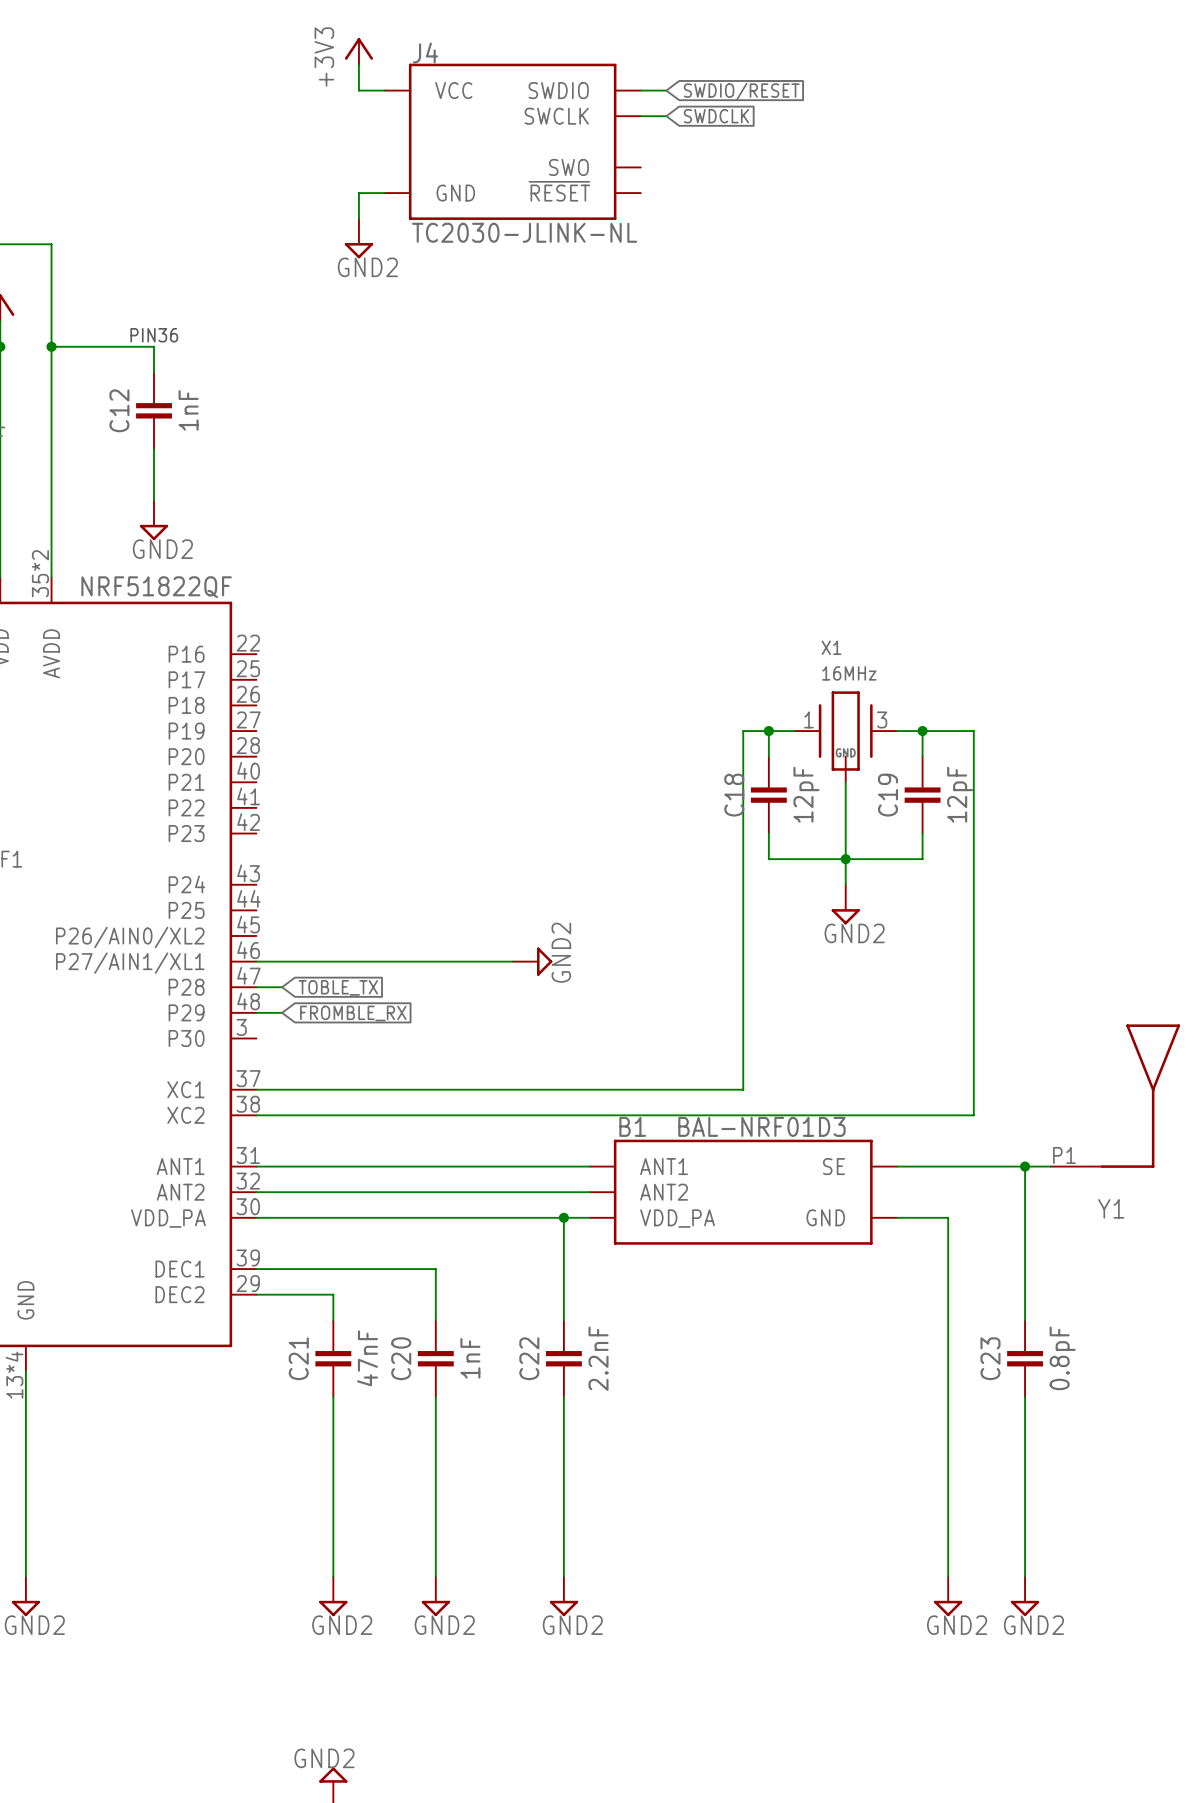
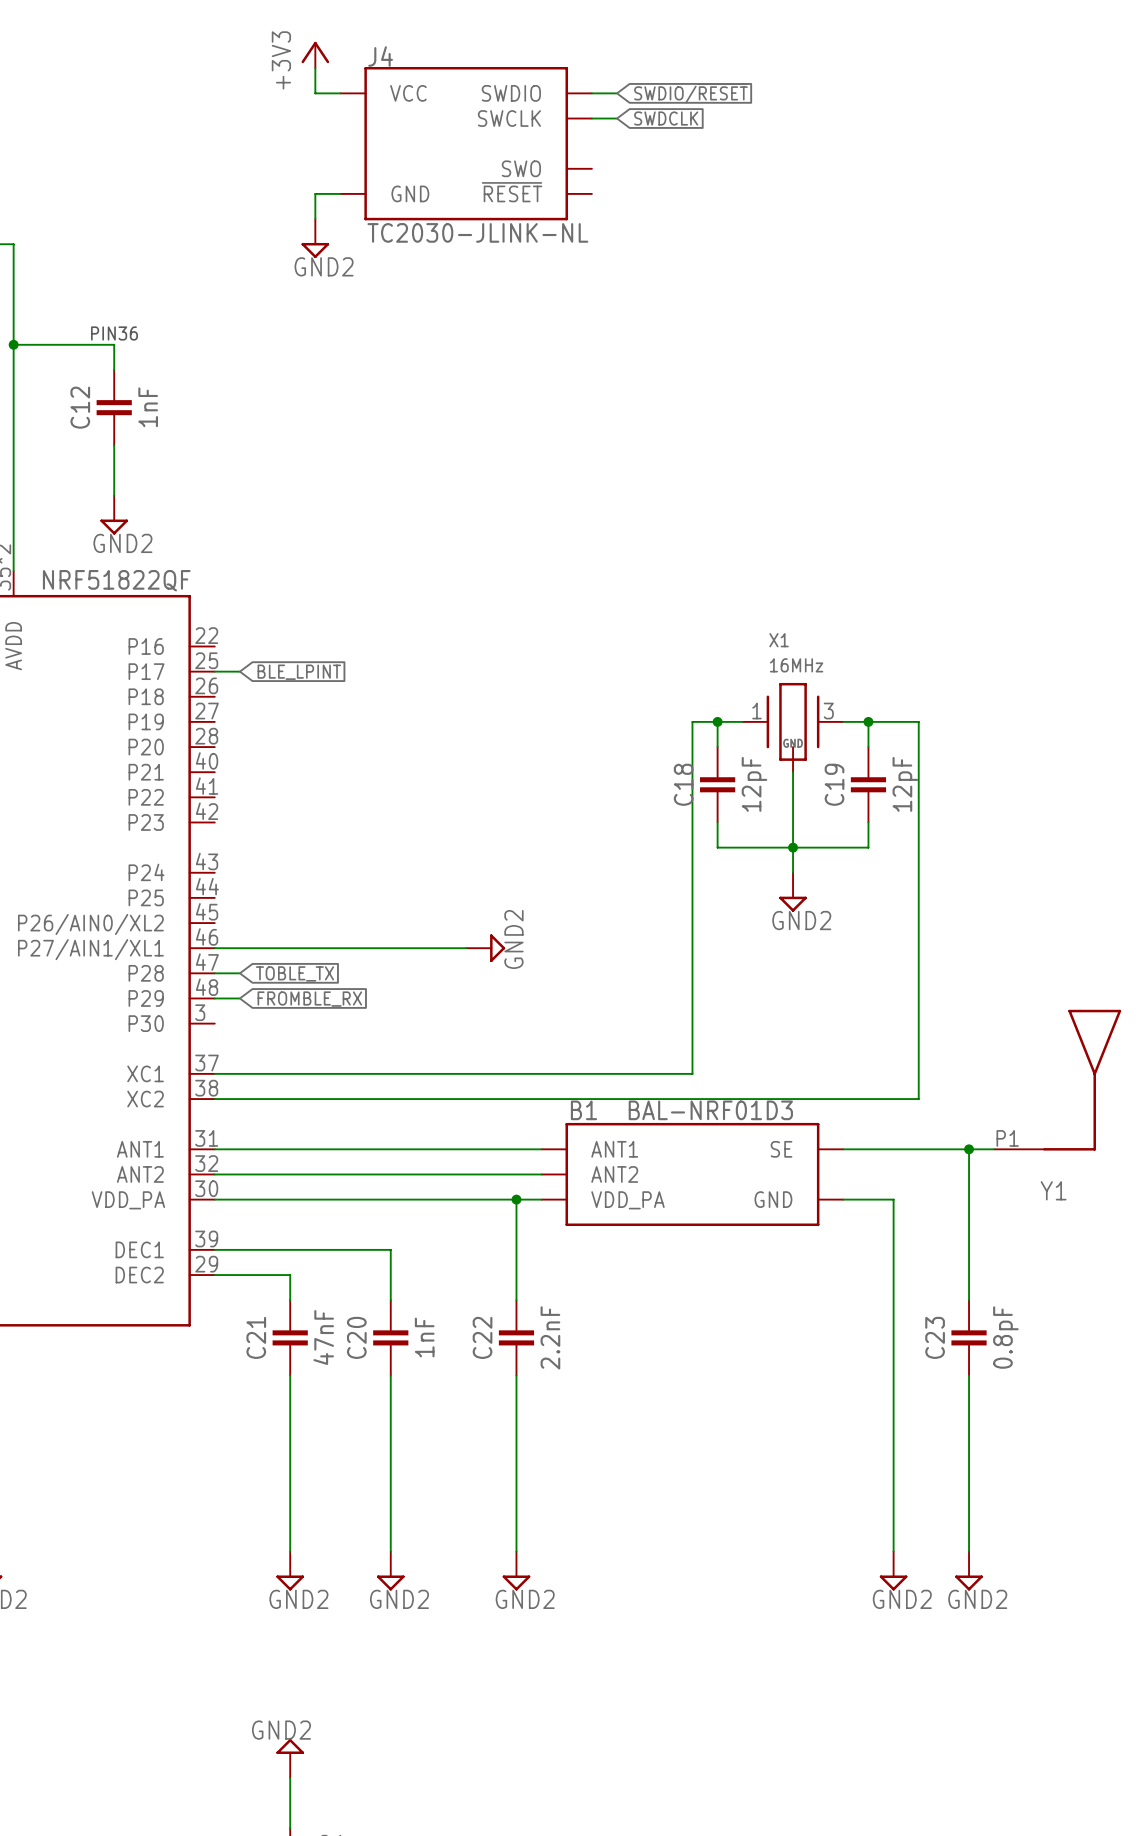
wire: none -> (214, 671) (239, 671)
global label: none -> BLE_LPINT (299, 672)

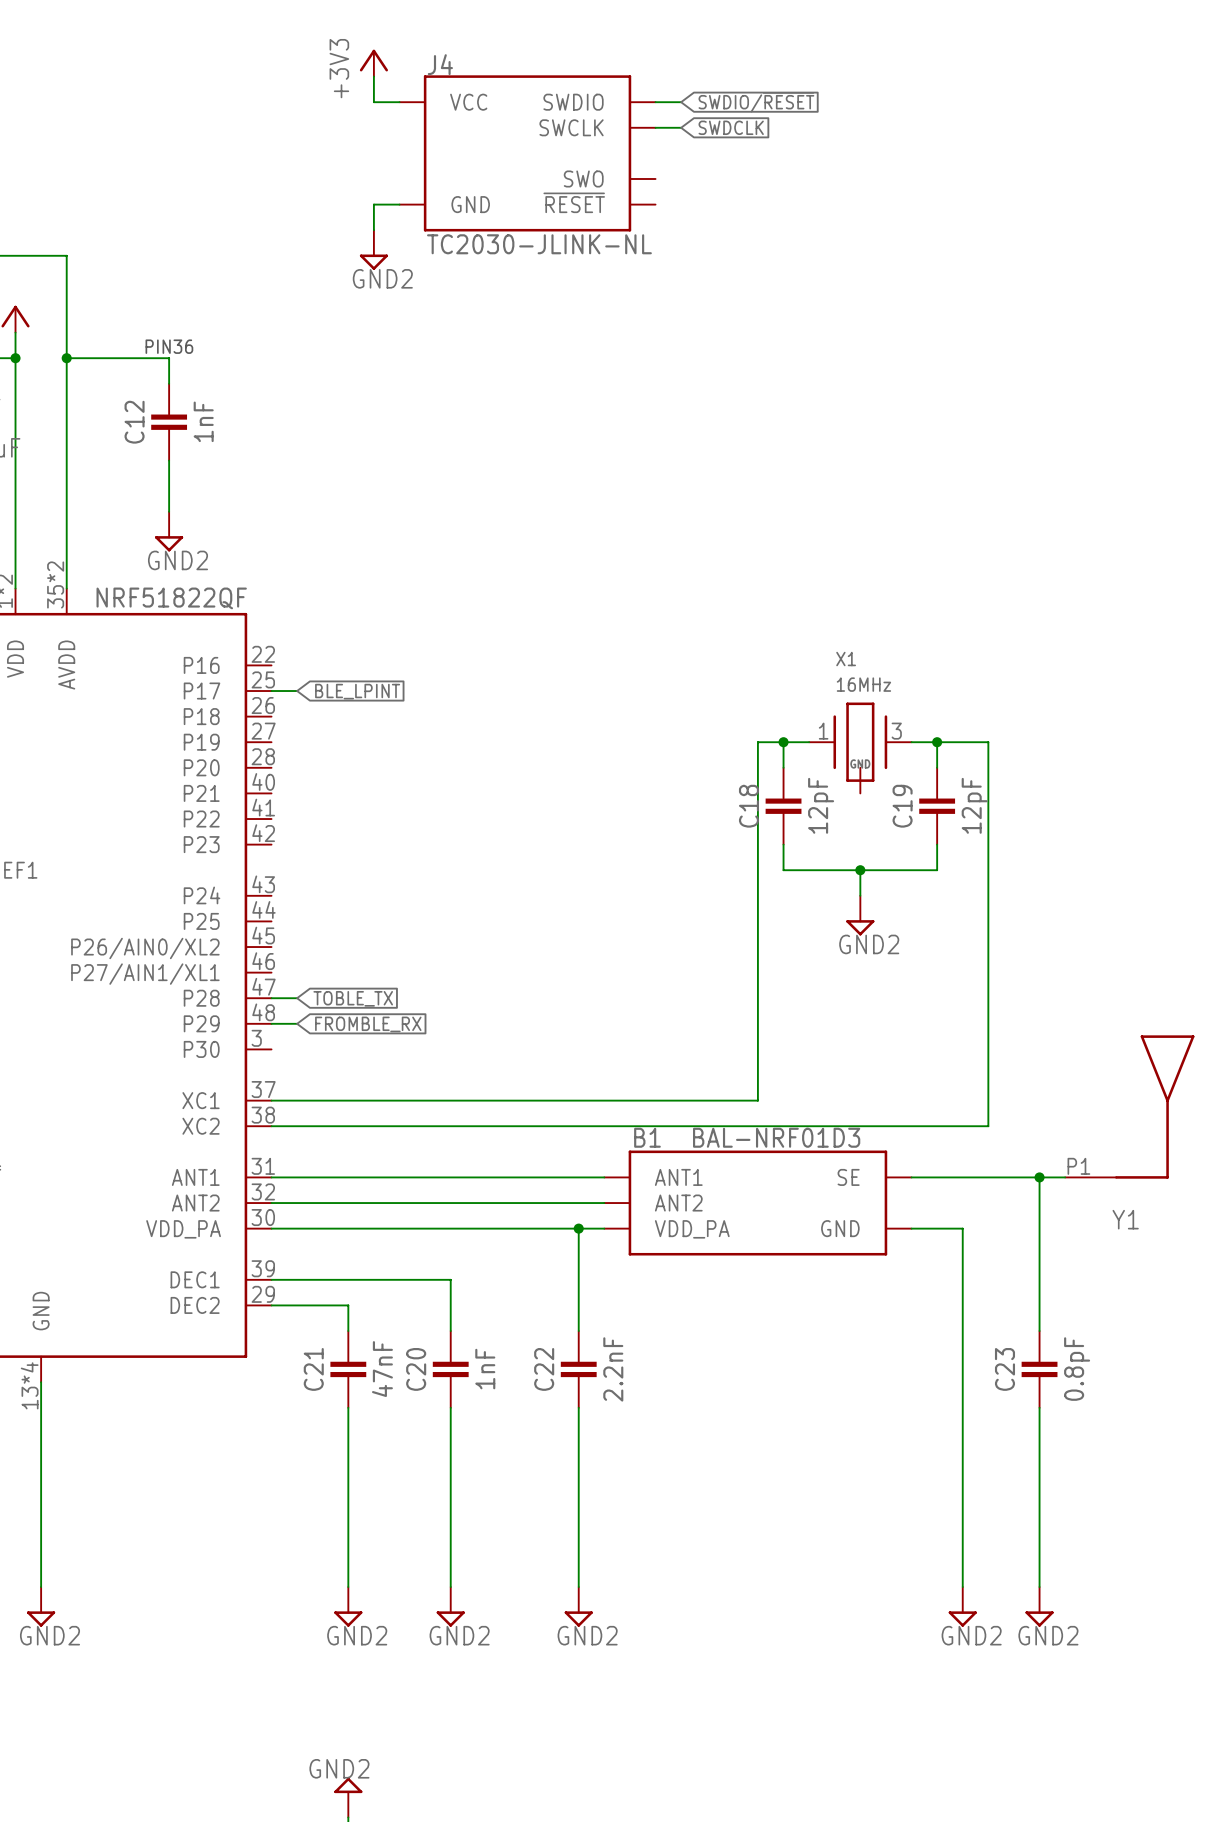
wire: (793, 772) (793, 847) -> none
wire: (214, 948) (466, 948) -> none
power symbol: GND2 (485, 948) -> none

